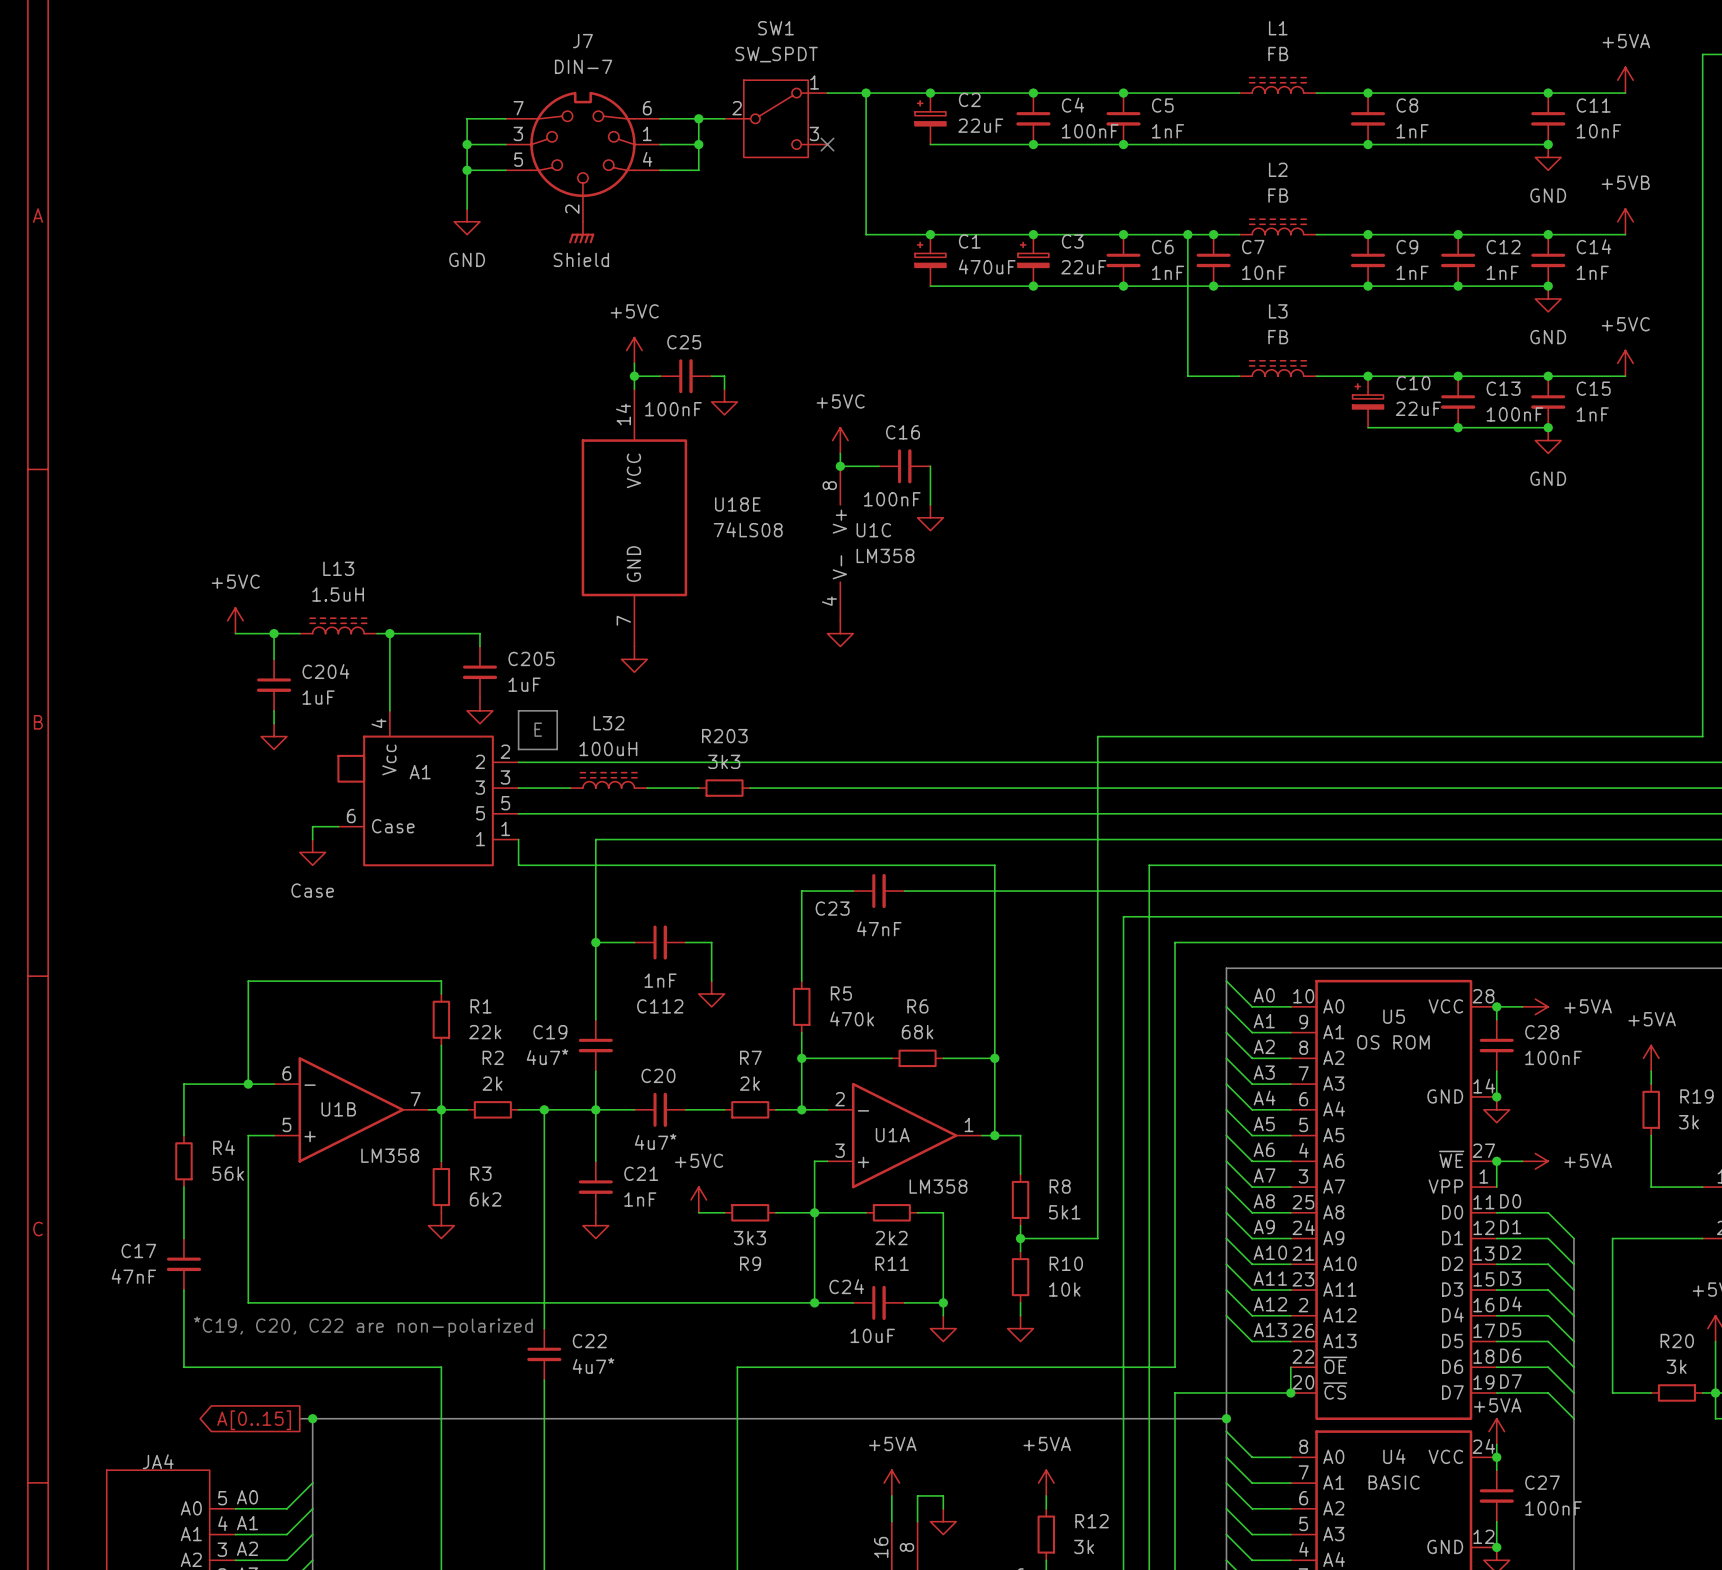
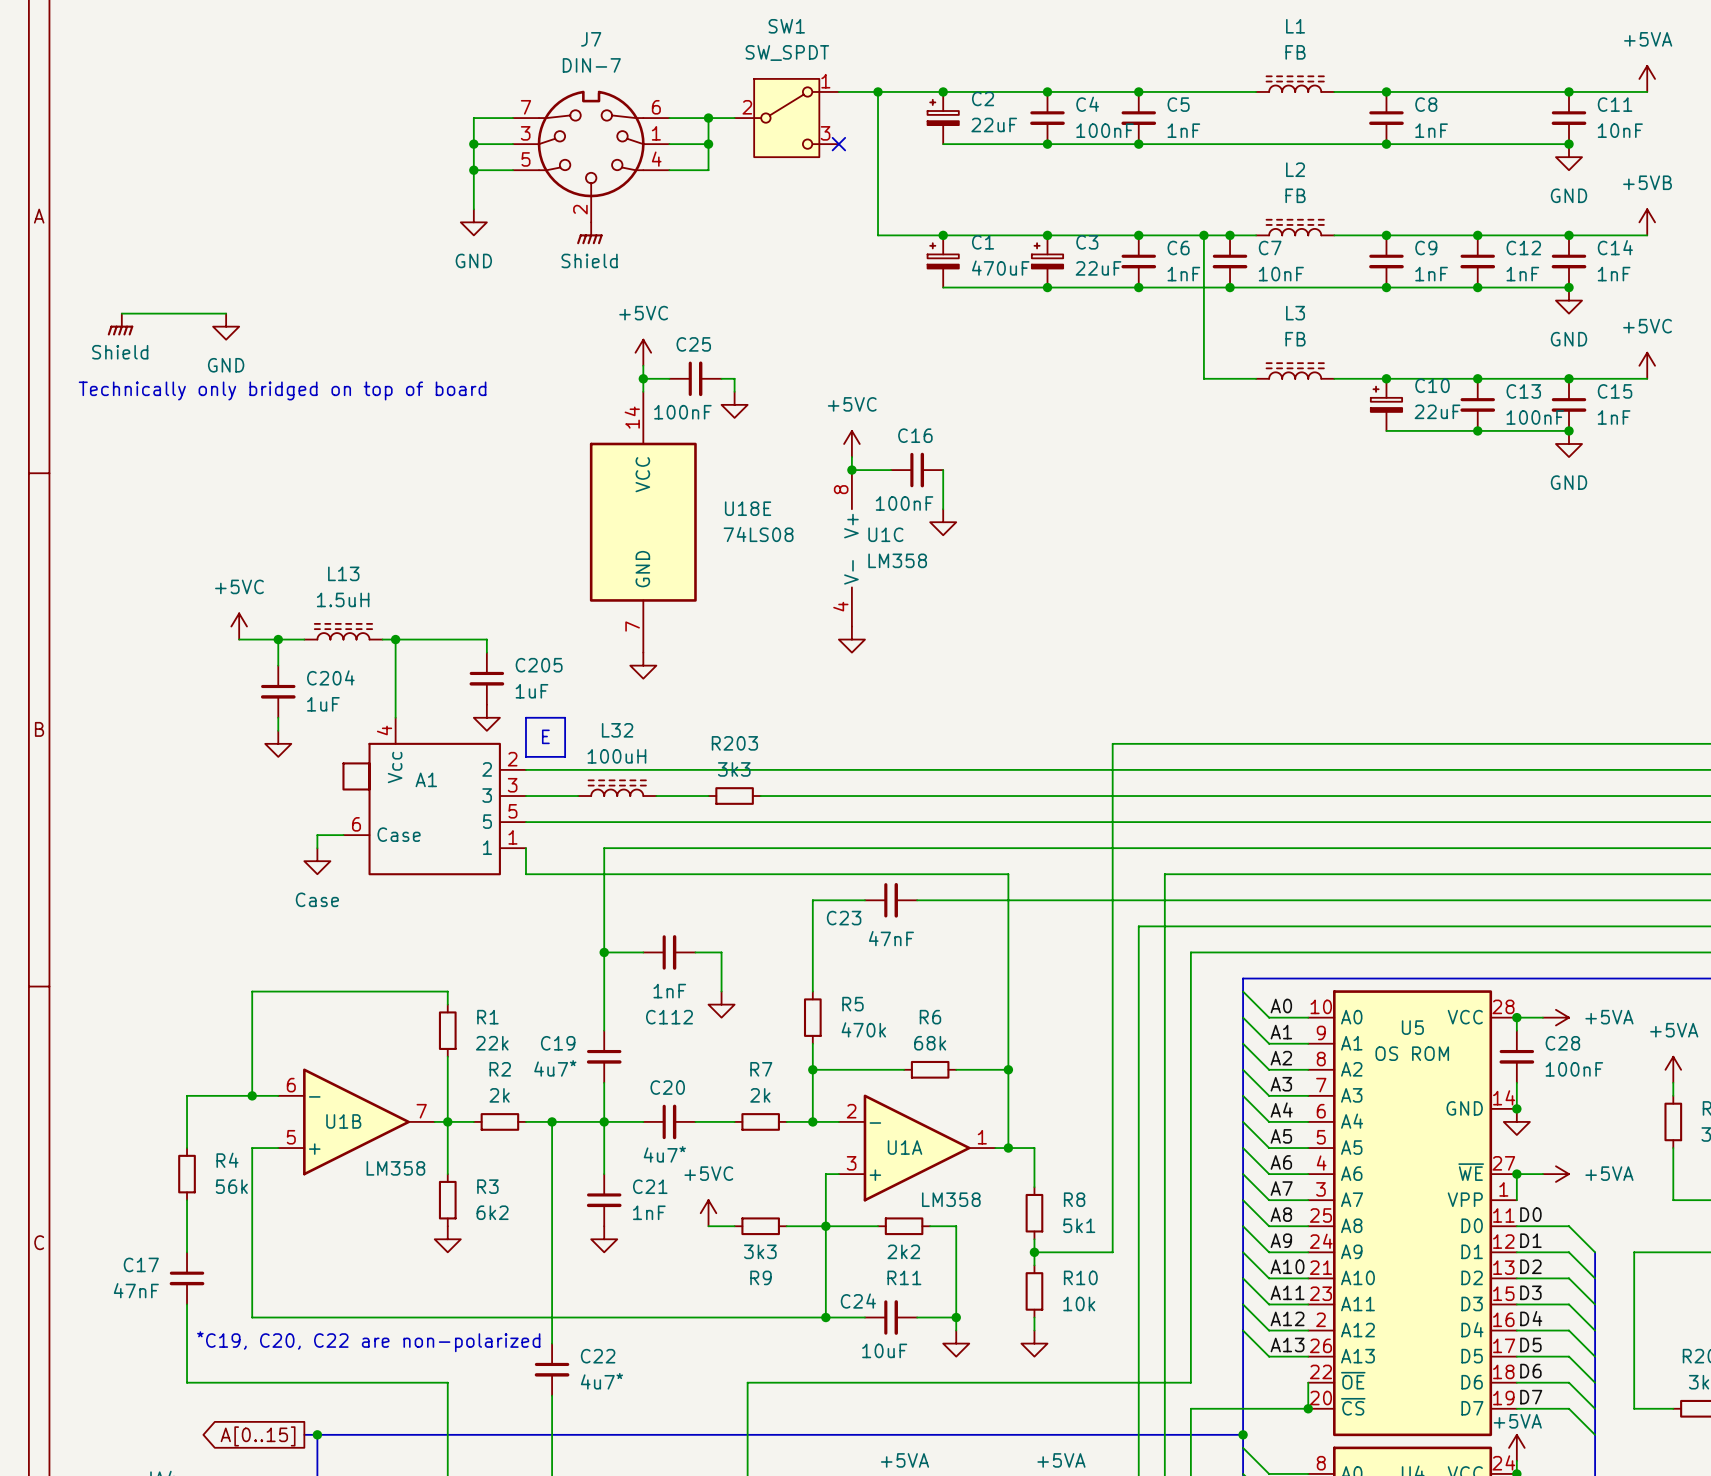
wire: none -> (121, 313) (226, 313)
power symbol: none -> Shield (120, 324)
power symbol: none -> GND (226, 326)
text: none -> Technically only bridged on top of board (282, 390)

